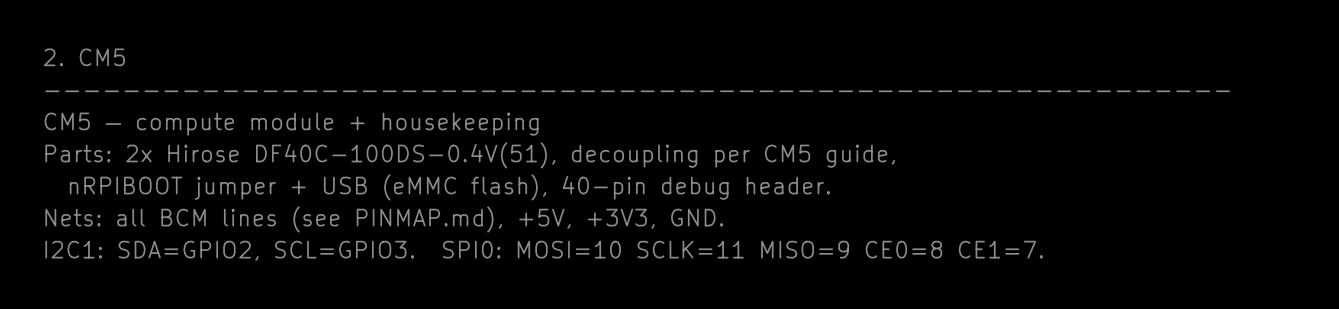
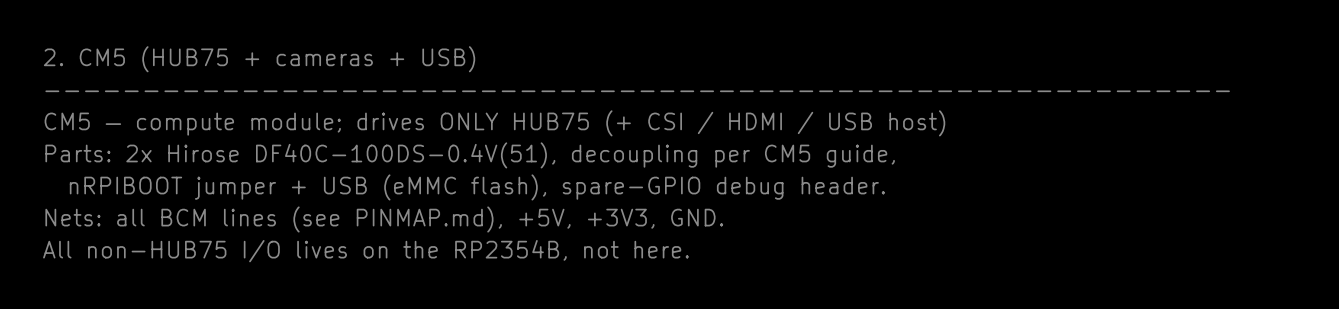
text: 2. CM5 (84, 57) -> 2. CM5 (HUB75 + cameras + USB) (259, 59)
text: CM5 — compute module + housekeeping (291, 124) -> CM5 — compute module; drives ONLY HUB75 (+ CSI / HDMI / USB host) (494, 123)
text: nRPIBOOT jumper + USB (eMMC flash), 40-pin debug header. (449, 187) -> nRPIBOOT jumper + USB (eMMC flash), spare-GPIO debug header. (477, 187)
text: I2C1: SDA=GPIO2, SCL=GPIO3. SPI0: MOSI=10 SCLK=11 MISO=9 CE0=8 CE1=7. (544, 250) -> All non-HUB75 I/O lives on the RP2354B, not here. (365, 251)

